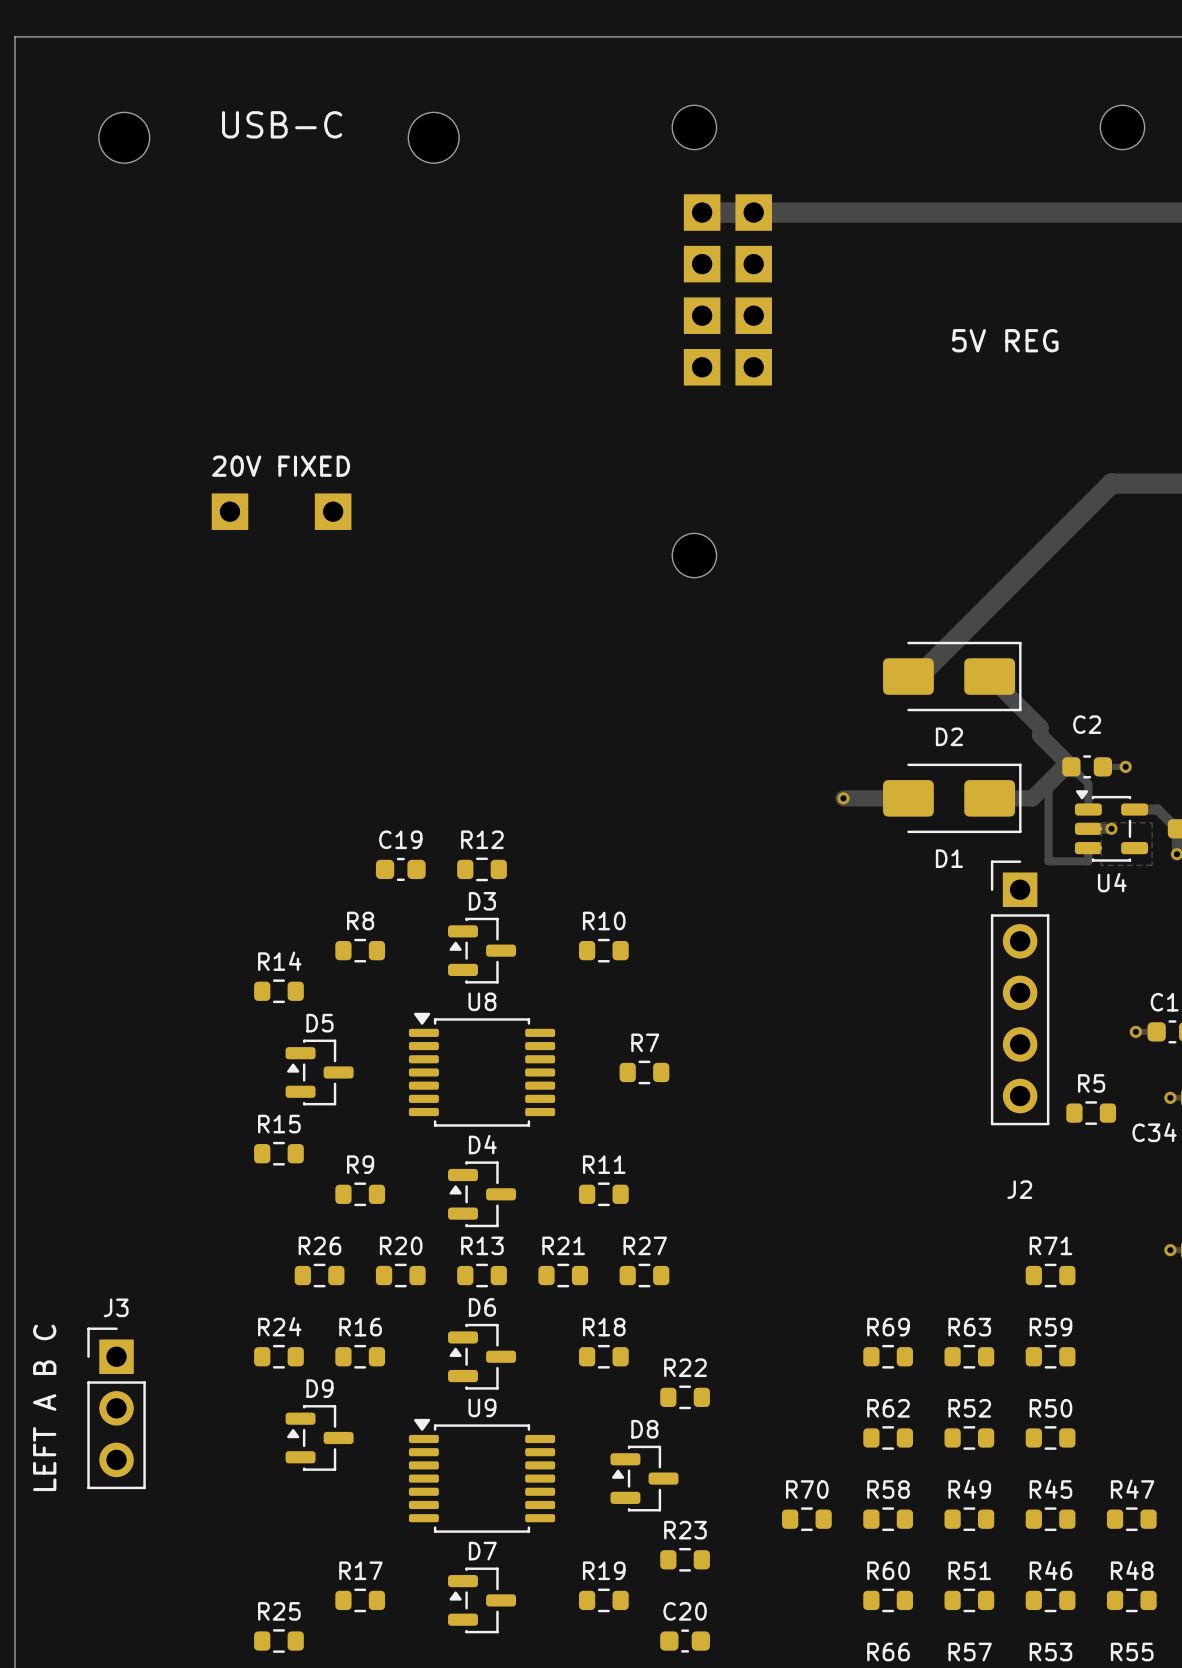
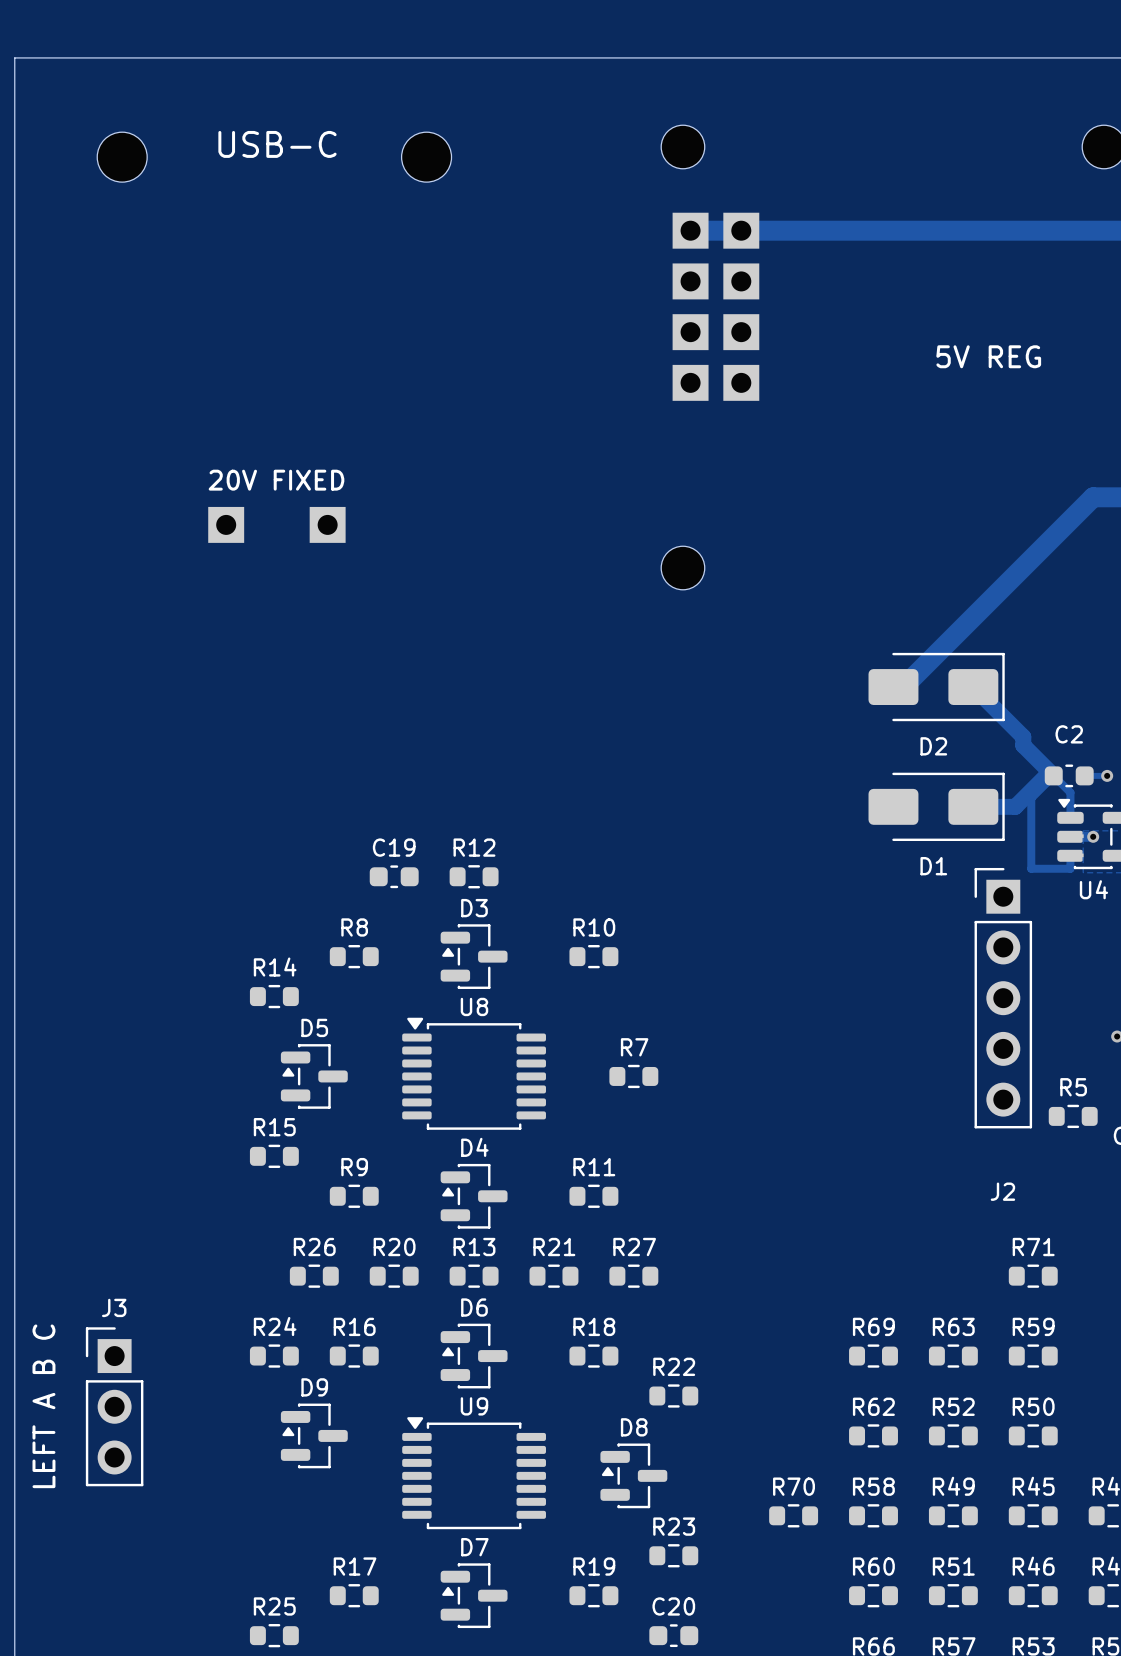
track: (843, 798) (908, 798) -> none
via: (843, 798) -> none

